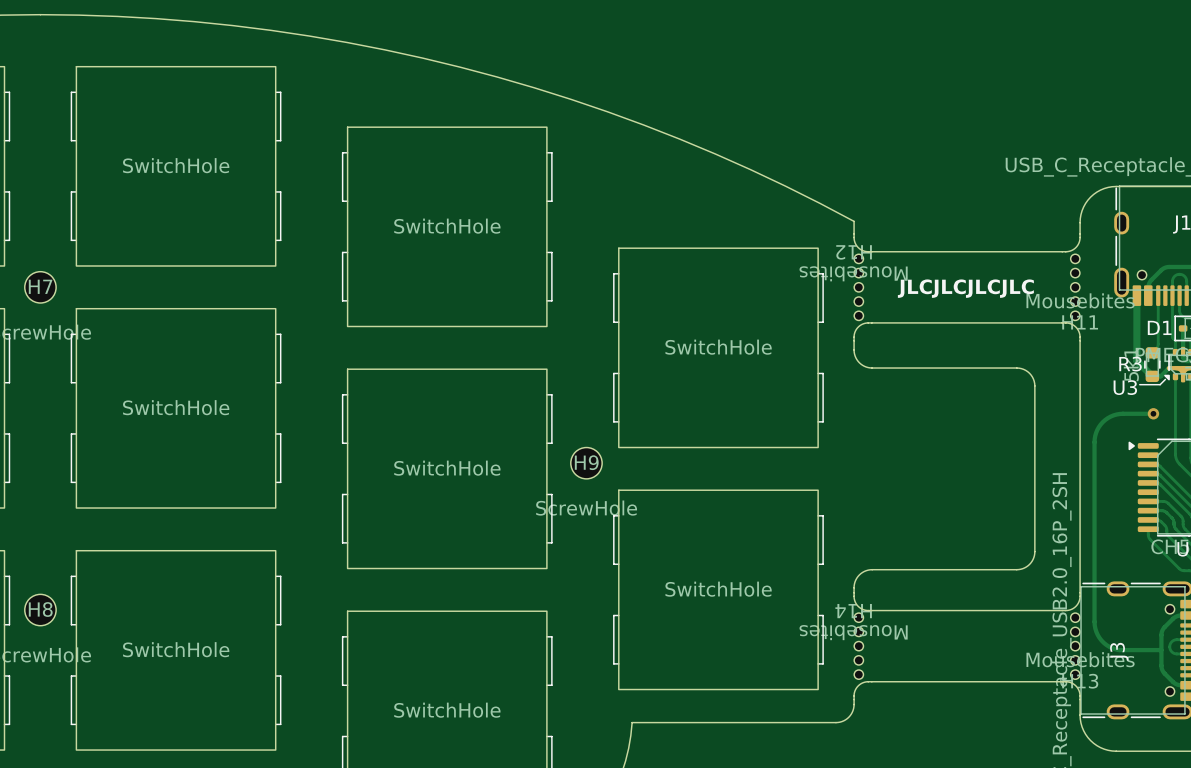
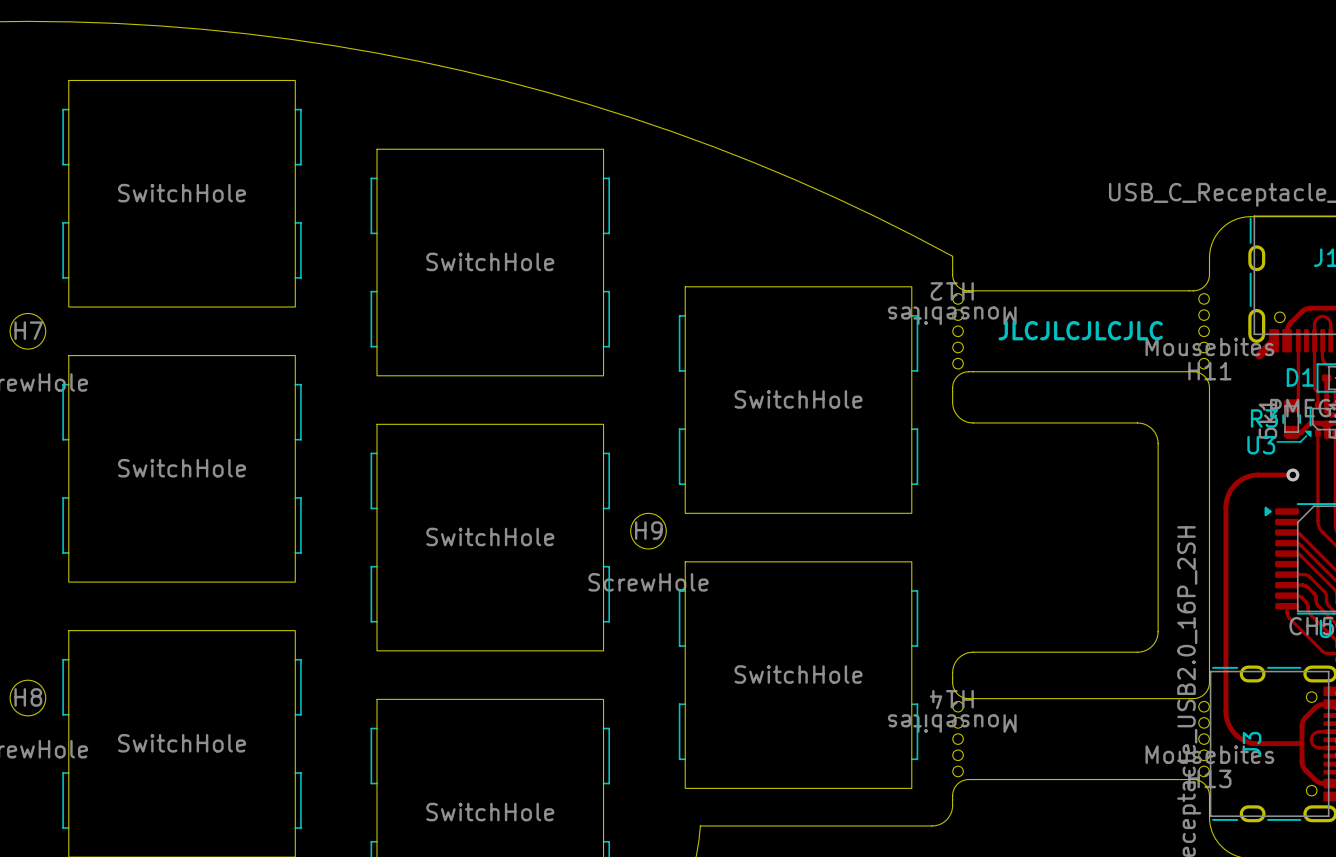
track: (1136, 295) (1136, 360) (1152, 376) -> (1274, 340) (1259, 355)

